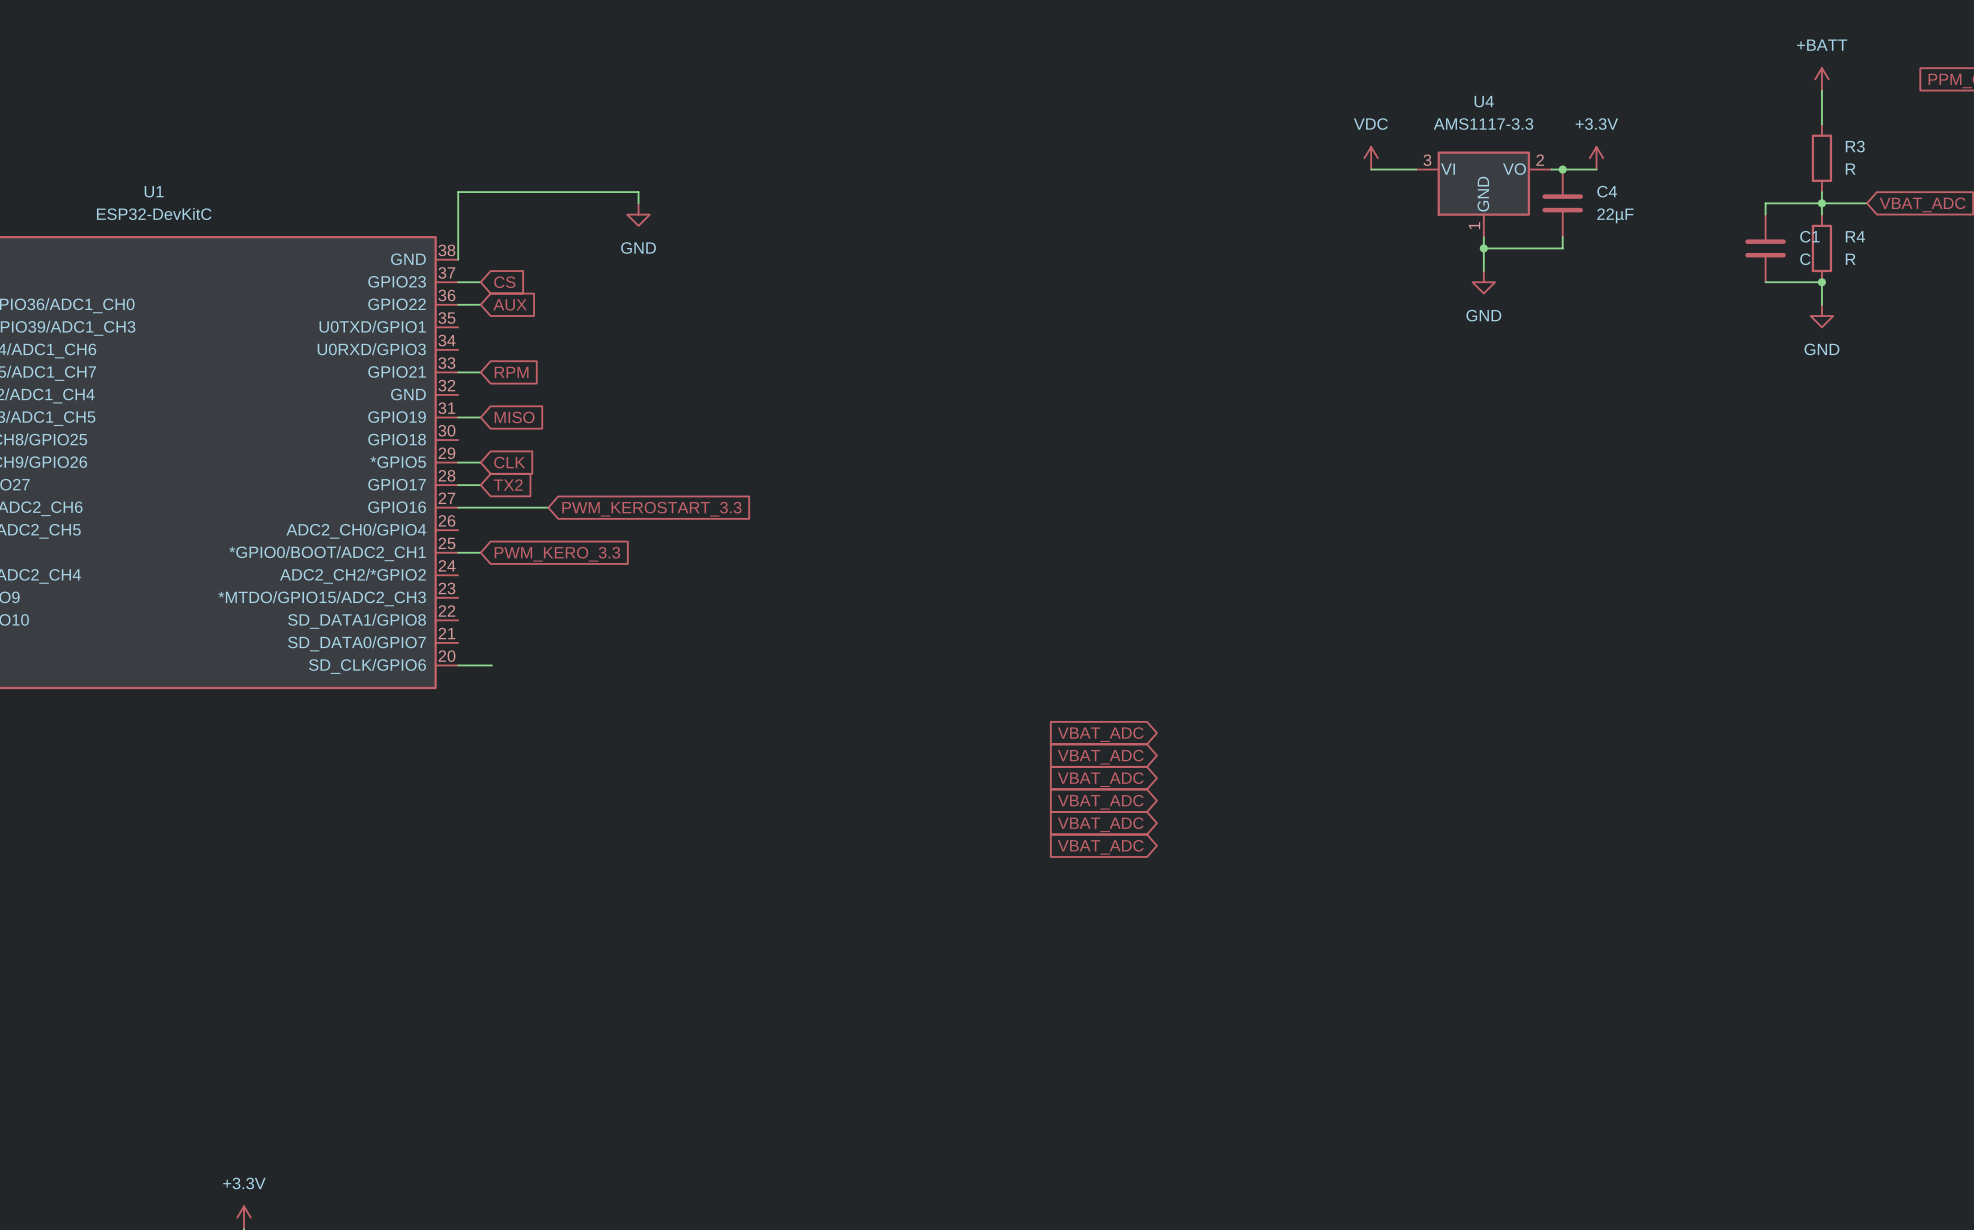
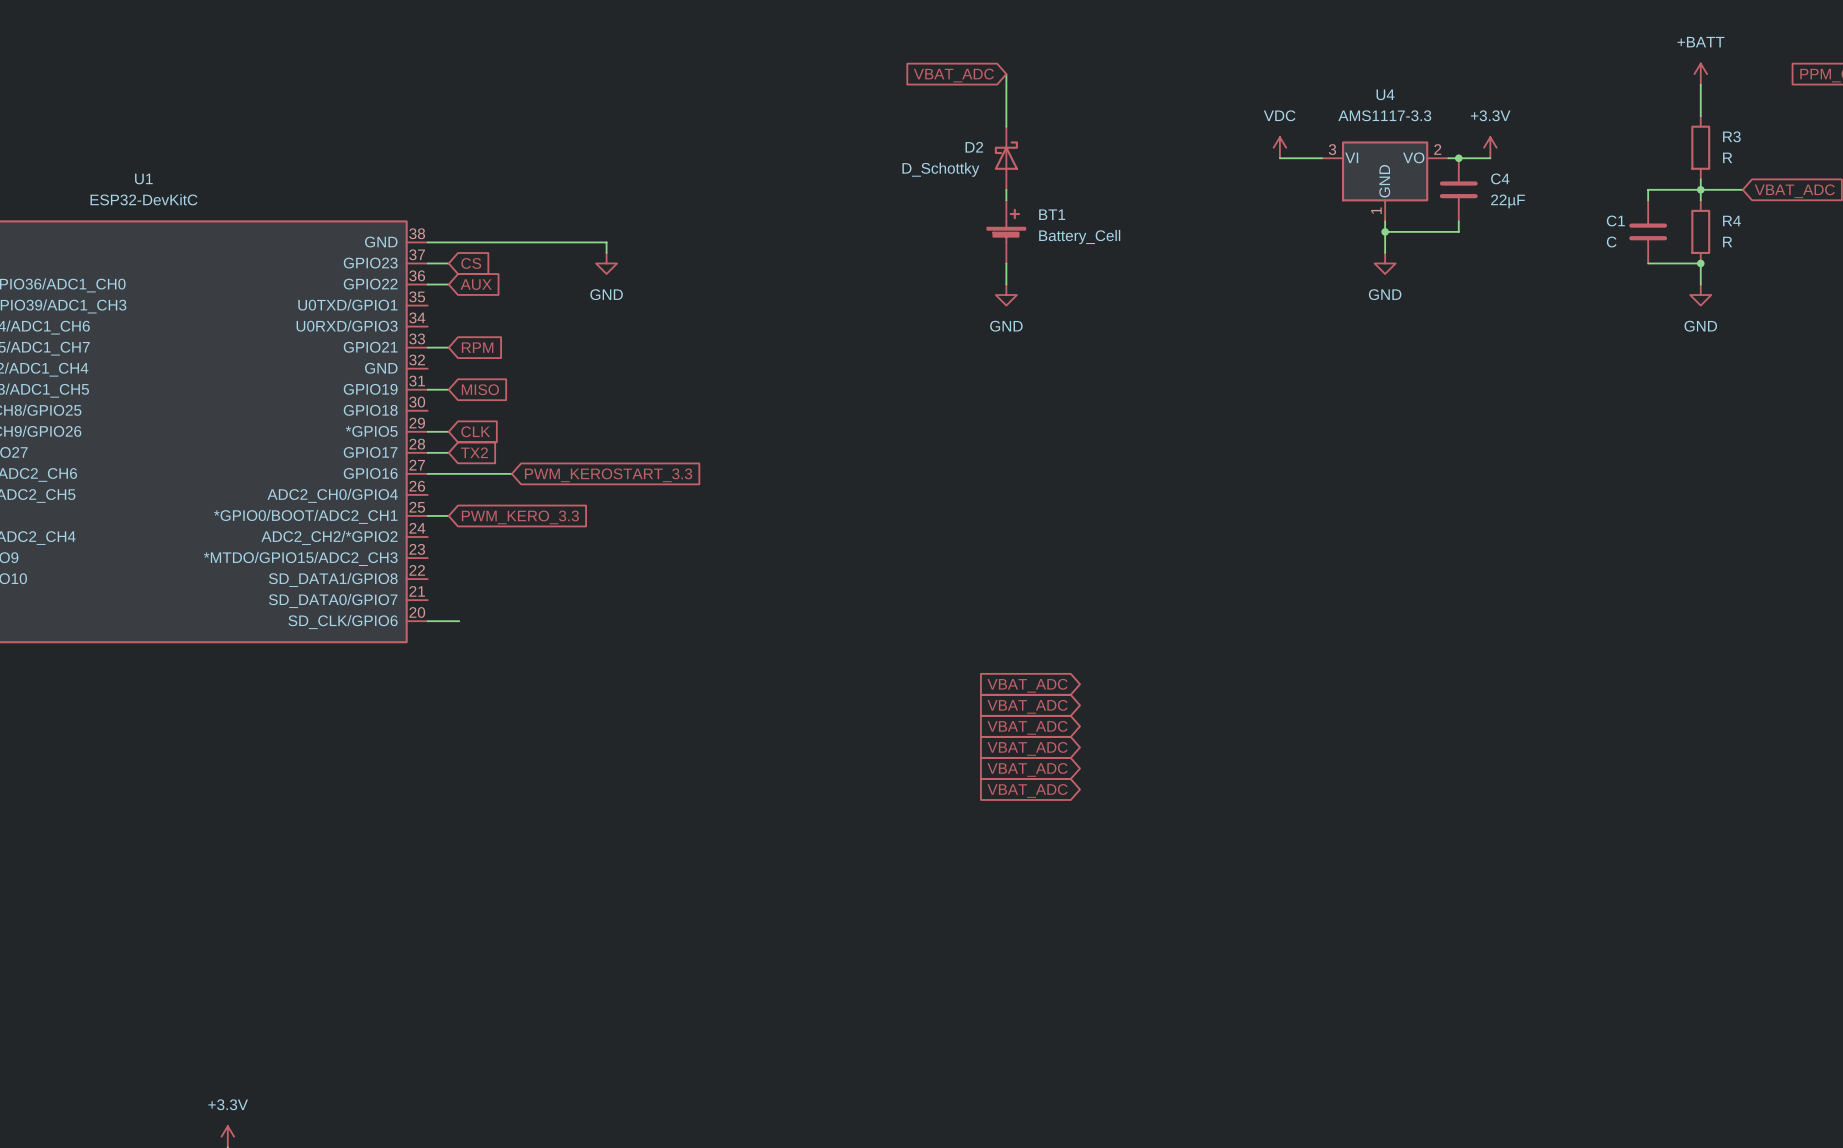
wire: none -> (1006, 74) (1006, 126)
global label: none -> VBAT_ADC (953, 75)
D2: none -> D_Schottky (1006, 158)
wire: (638, 203) (638, 192) (458, 192) (458, 259) -> (606, 252) (606, 242) (427, 242)
wire: none -> (1006, 189) (1006, 200)
power symbol position: GND (638, 214) -> GND (606, 263)
C1 name position: C1 (1809, 236) -> C1 (1615, 220)
BT1: none -> Battery_Cell (1006, 231)
C1 value position: C (1805, 259) -> C (1611, 242)
wire: none -> (1006, 263) (1006, 284)
power symbol: none -> GND (1006, 295)

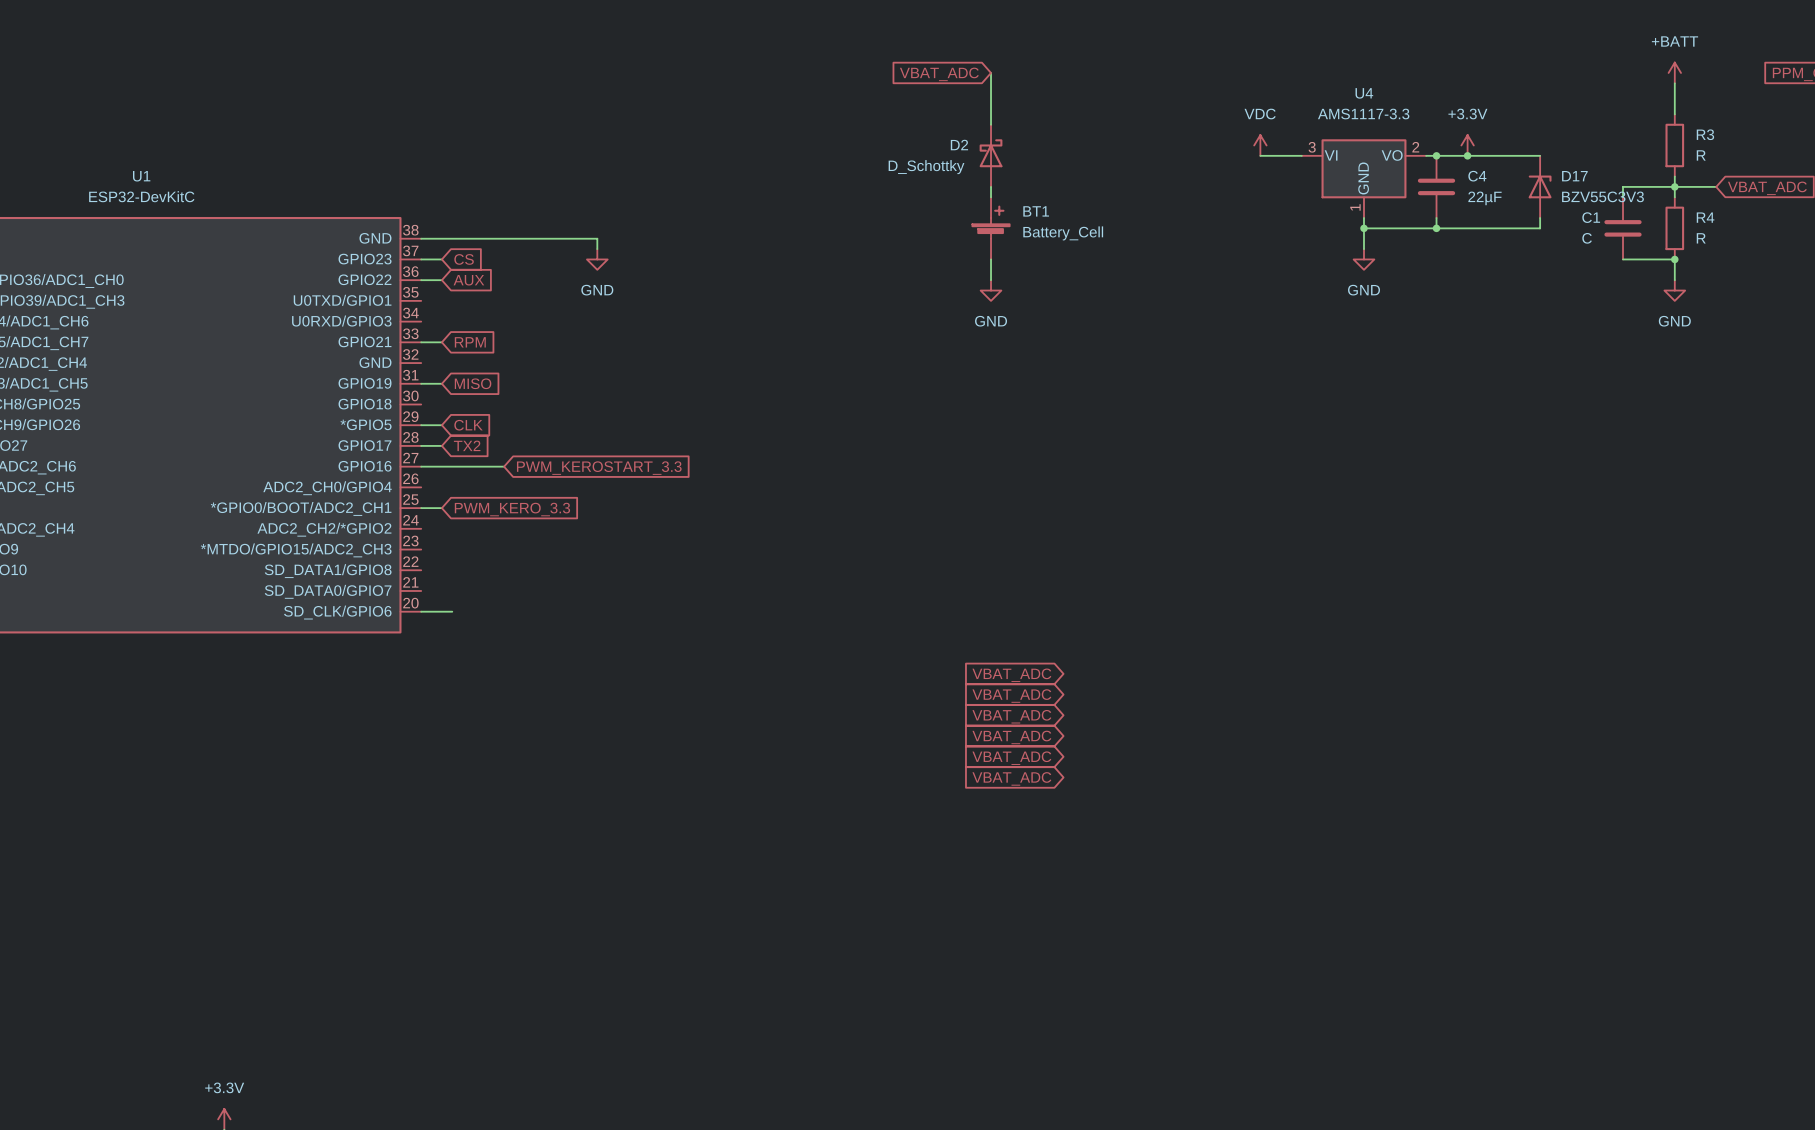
wire: none -> (1467, 155) (1540, 155)
junction: none -> (1467, 155)
D17: none -> BZV55C3V3 (1540, 186)
wire: none -> (1540, 218) (1540, 228) (1436, 228)
junction: none -> (1436, 228)

